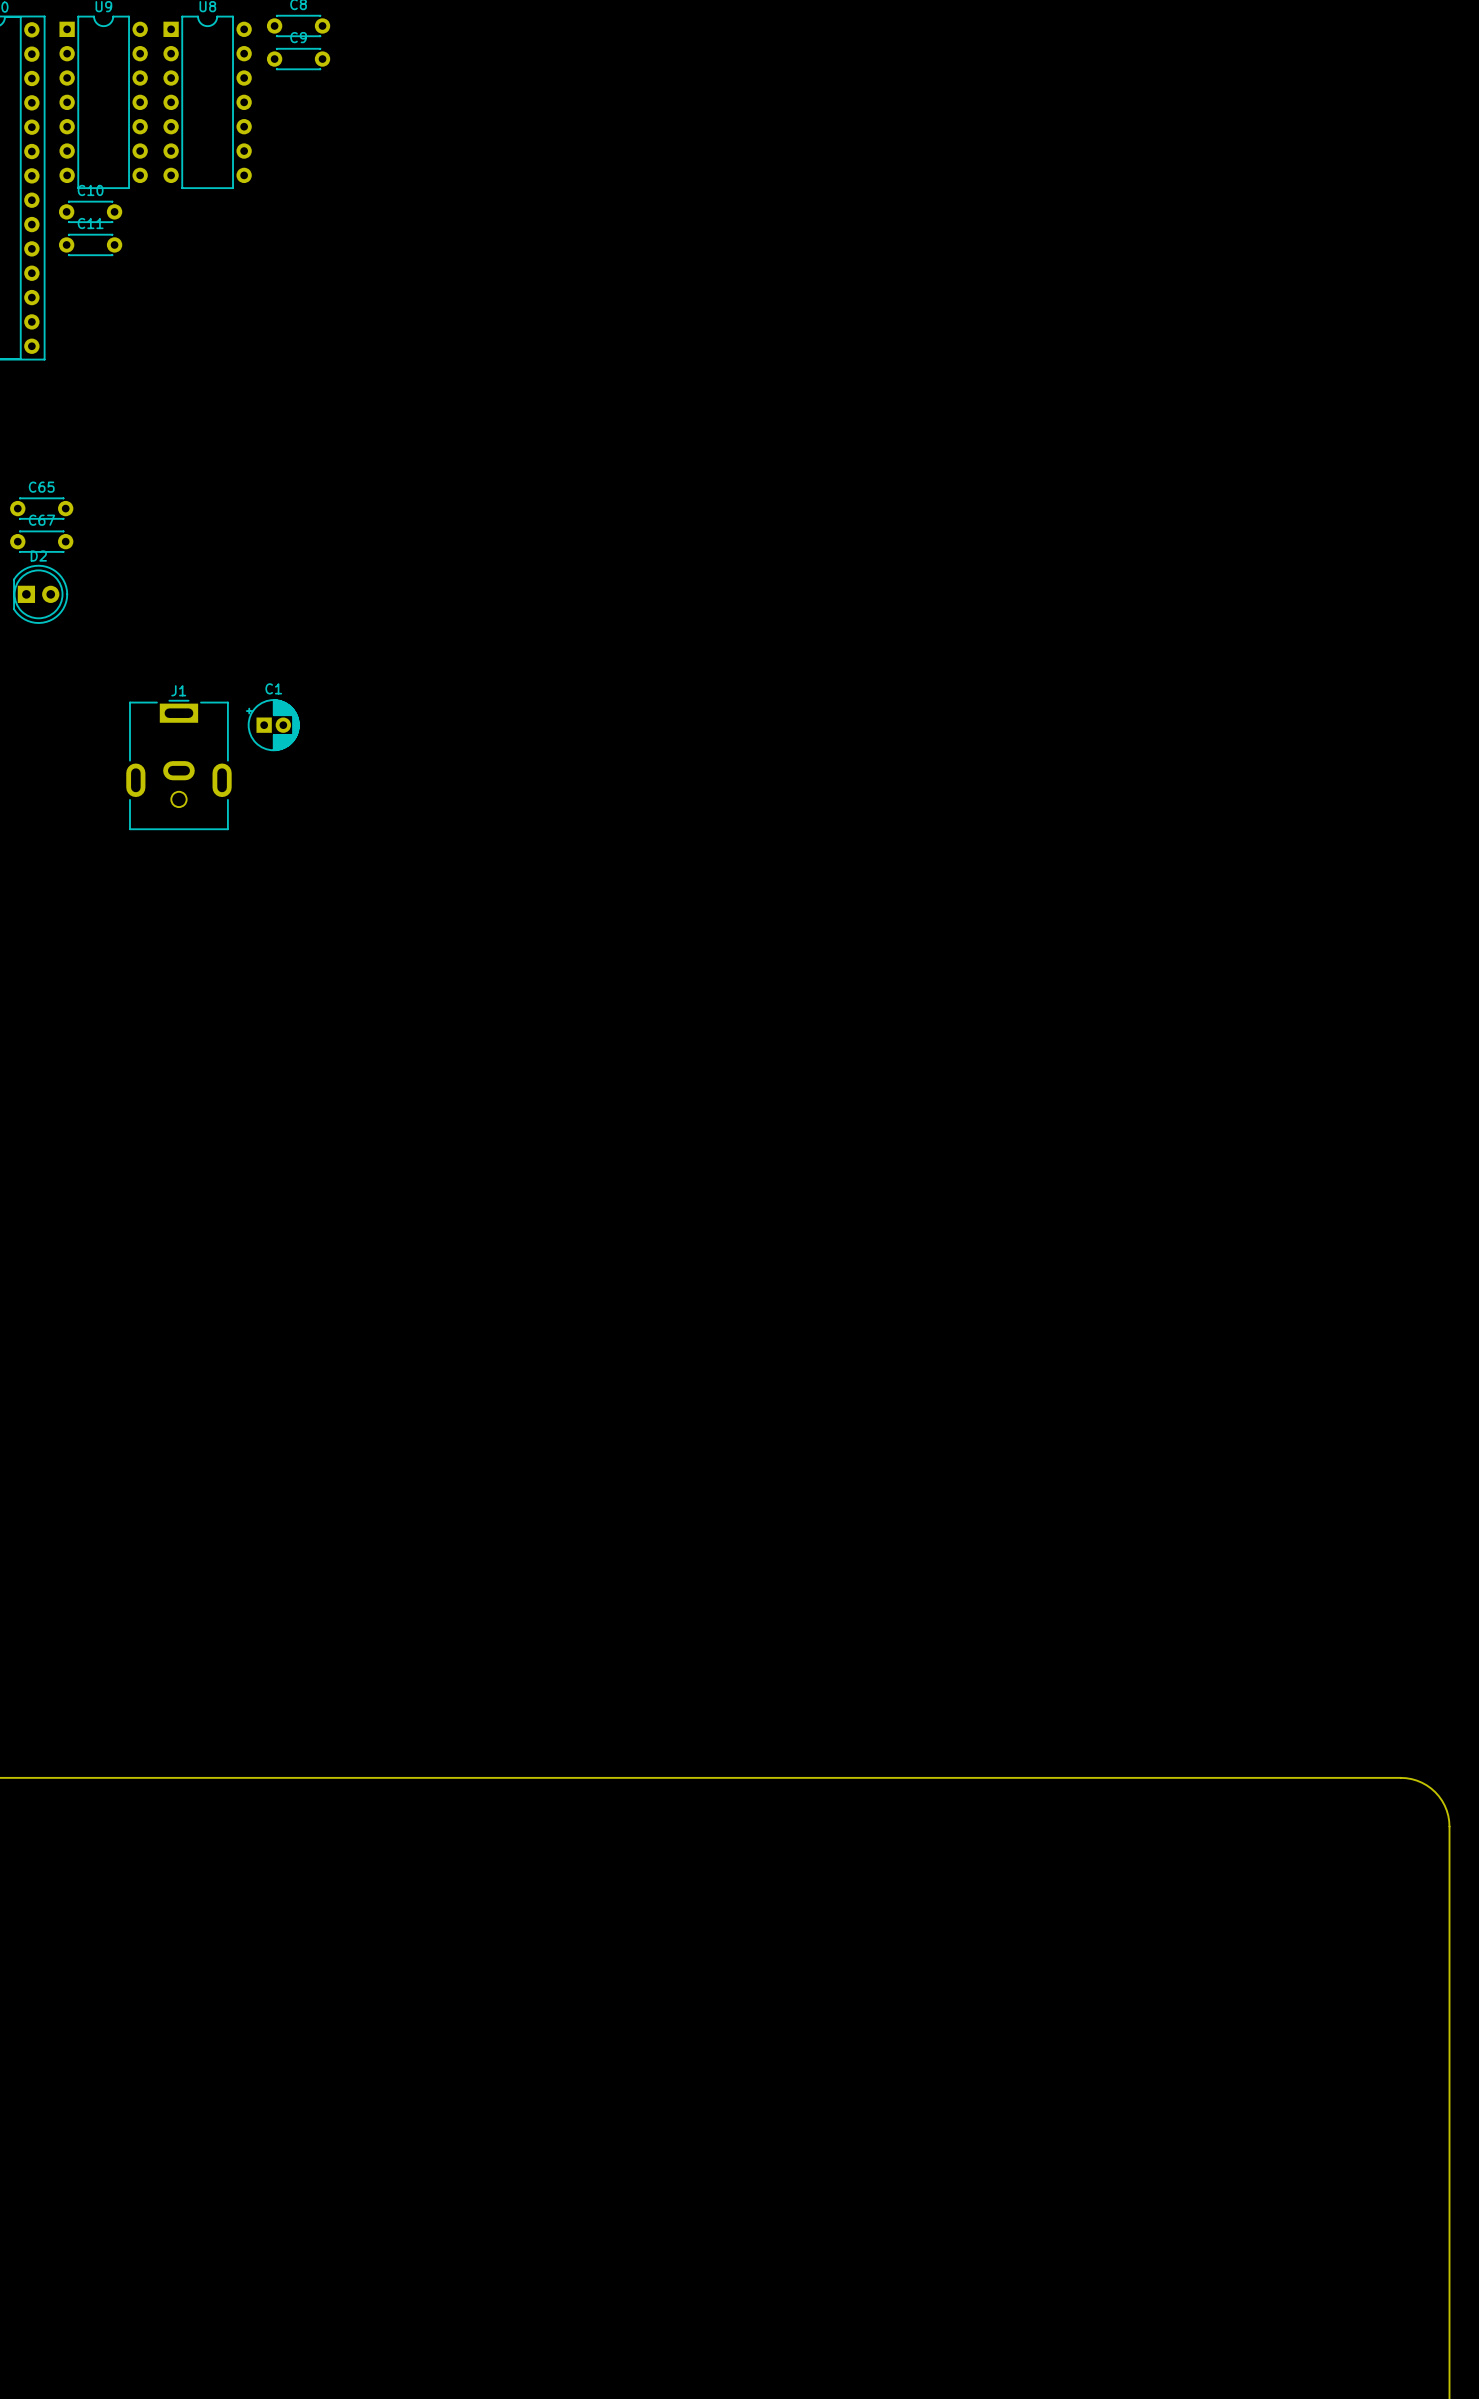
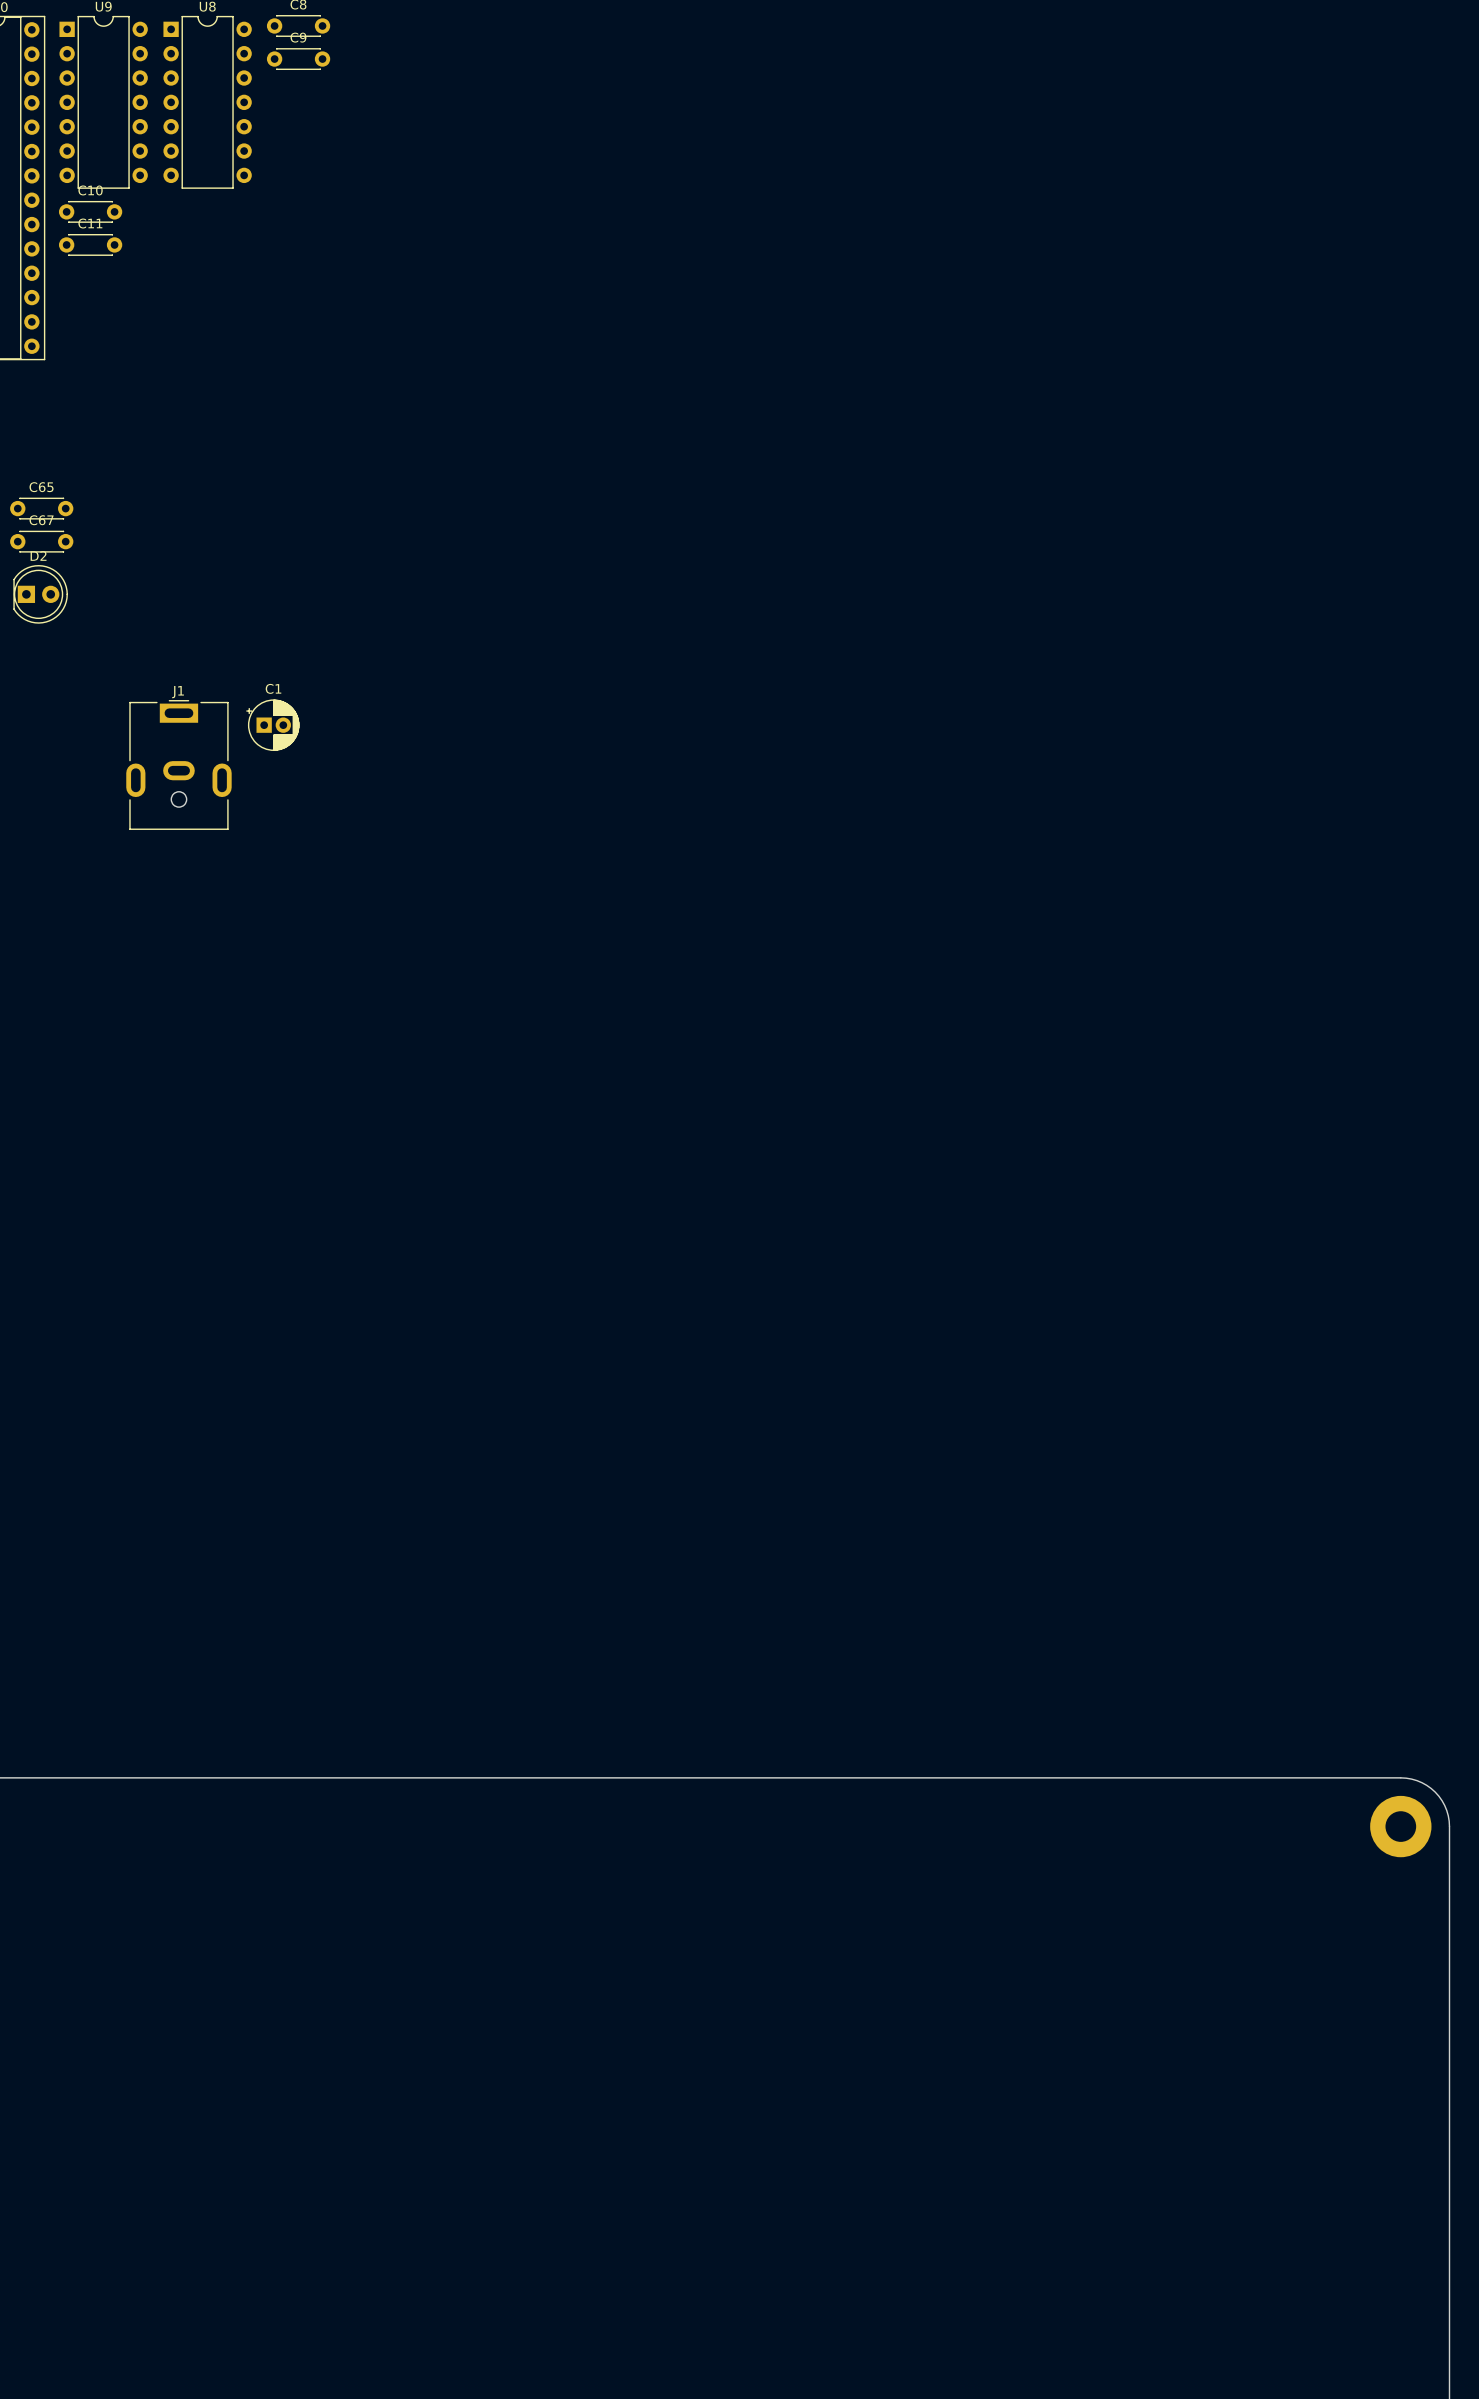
part: none -> (1400, 1826)

